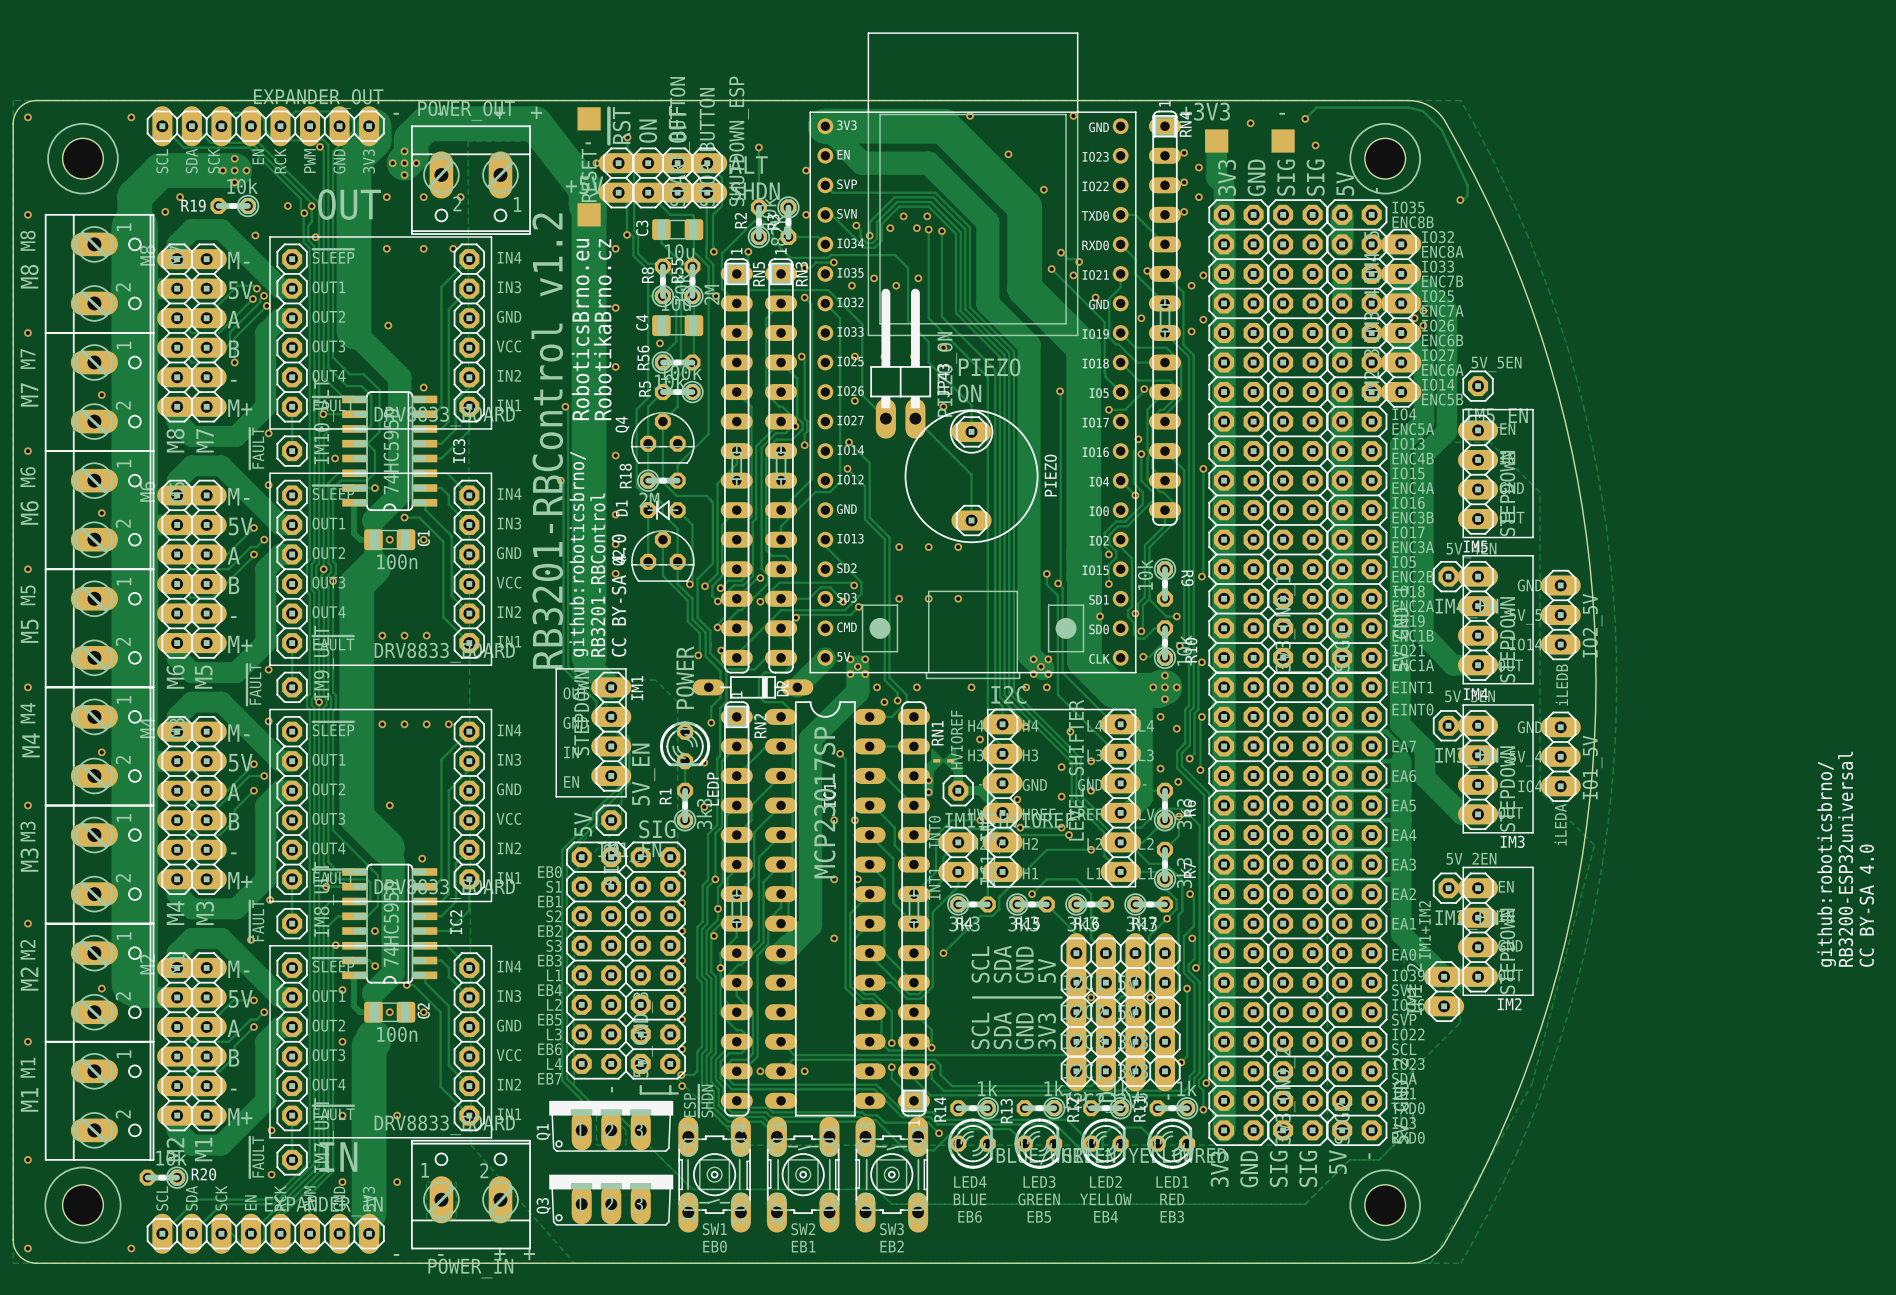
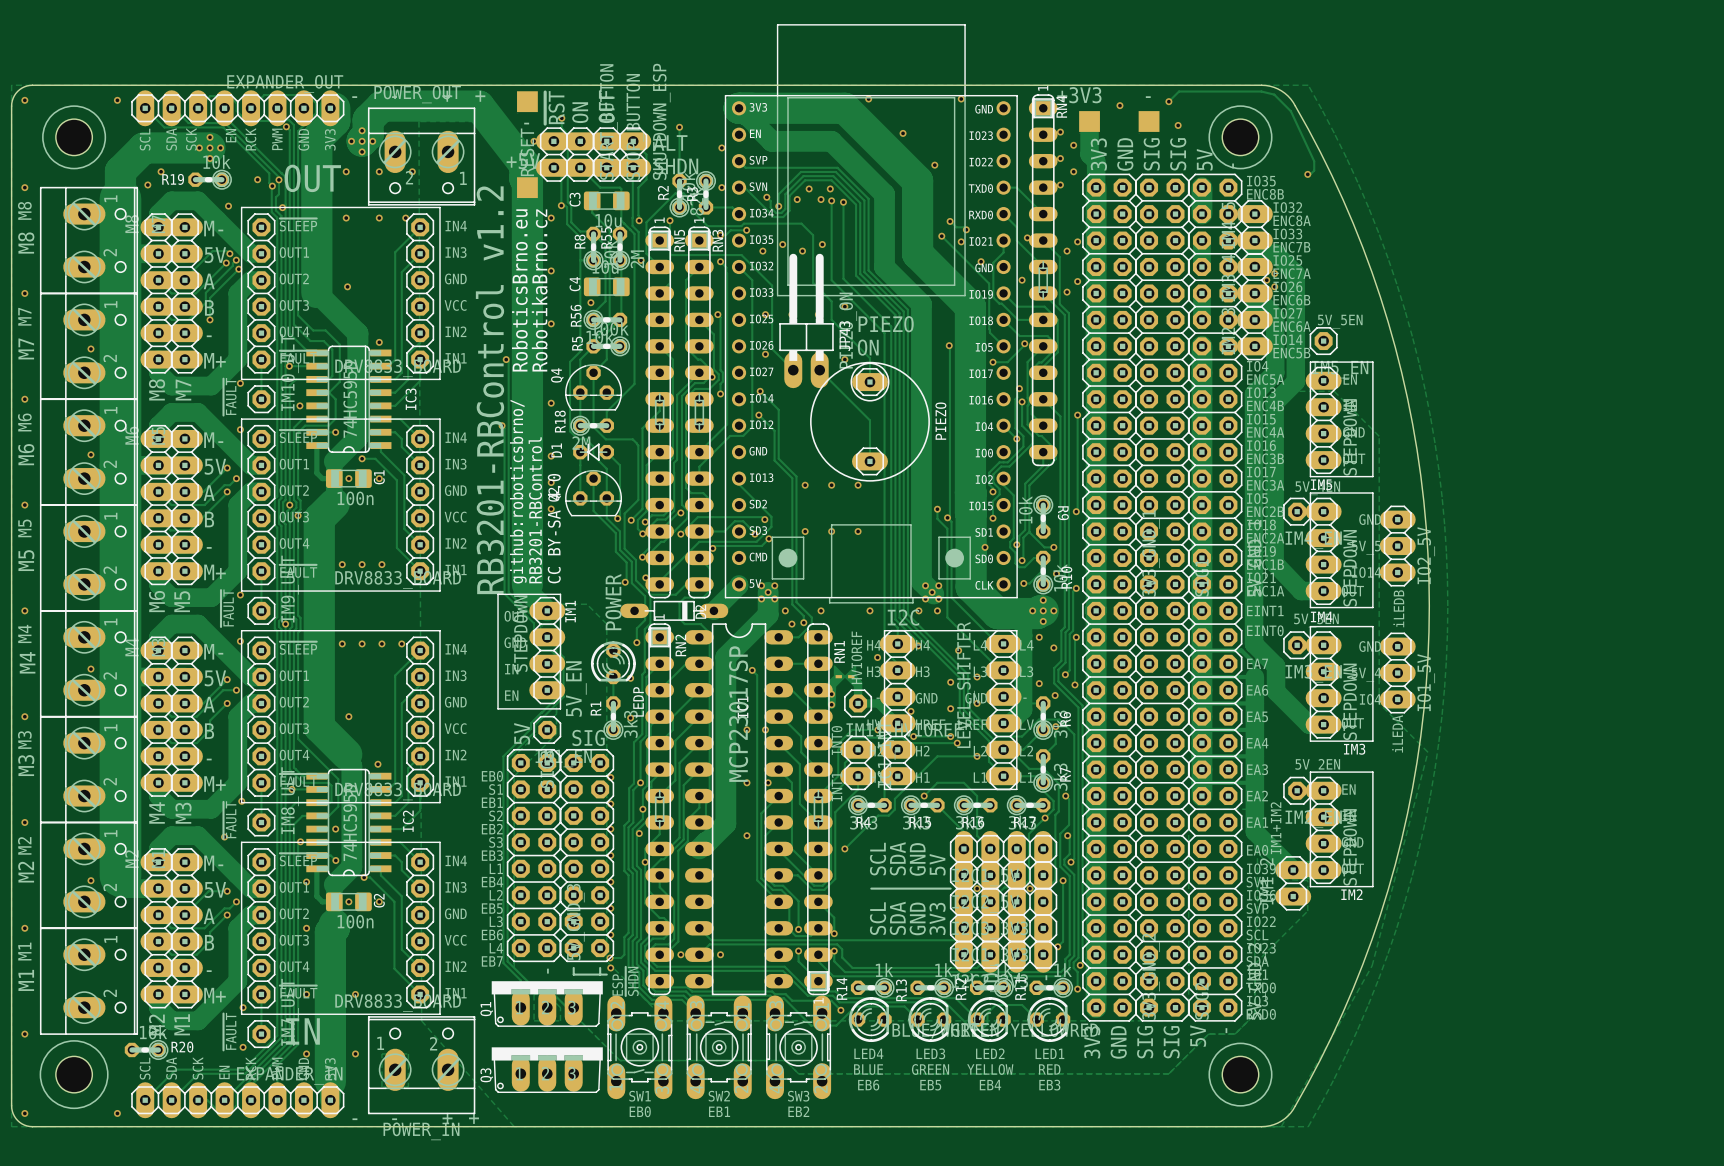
text: RB3200-ESP32universal (1845, 859) -> none
text: github:roboticsbrno/ (1826, 864) -> none
text: CC BY-SA 4.0 (1866, 905) -> none

